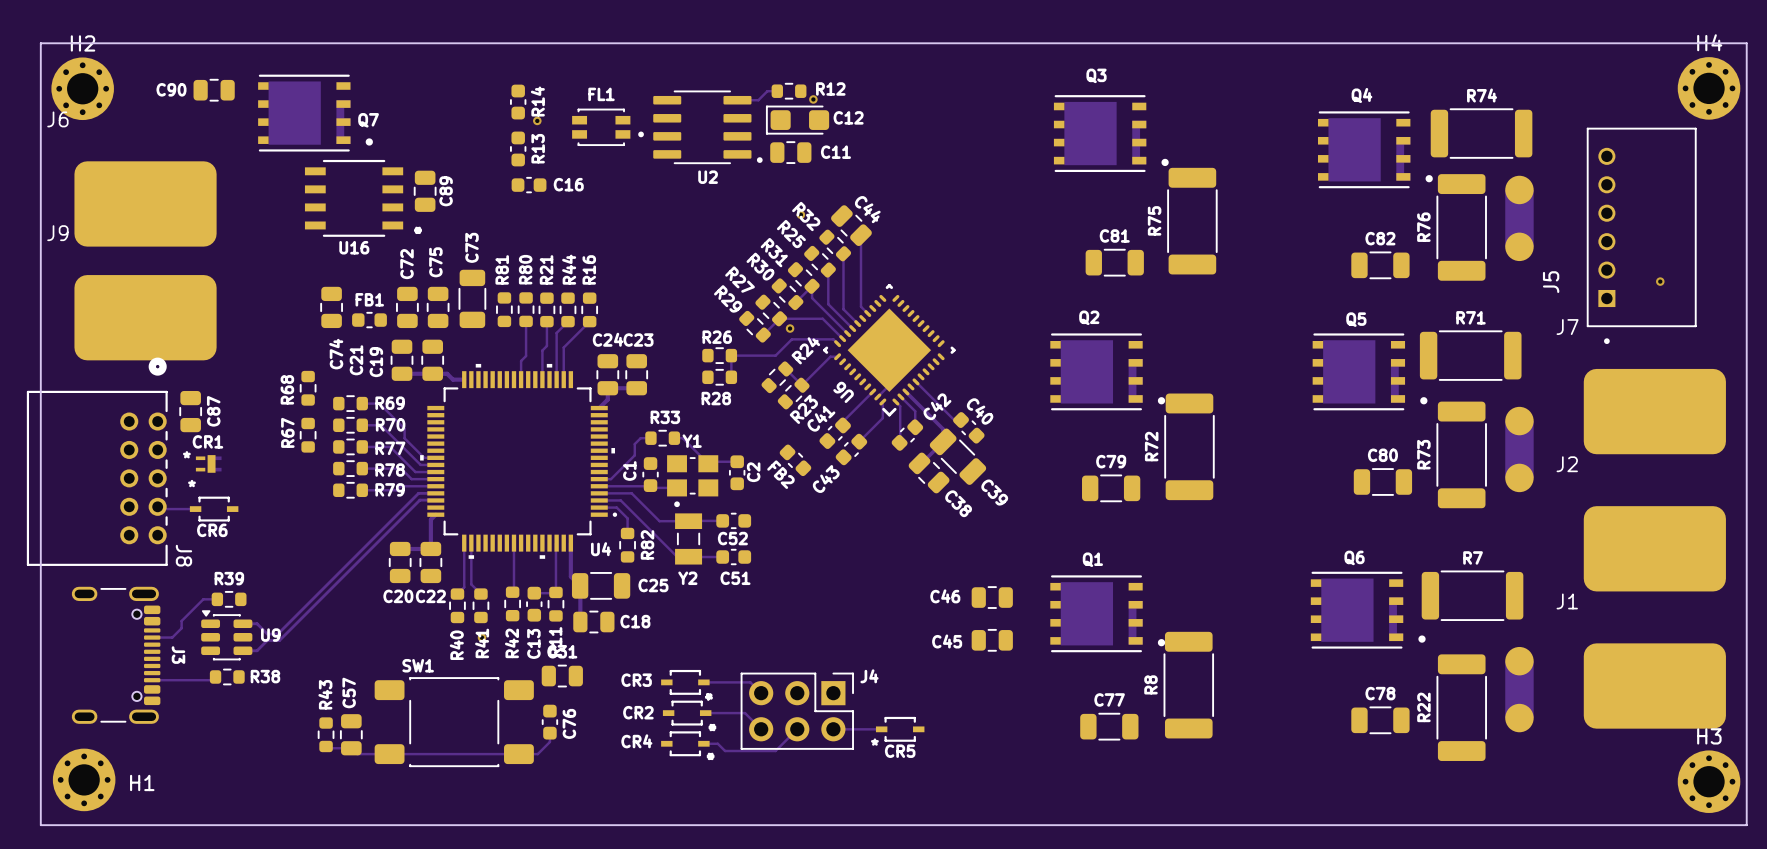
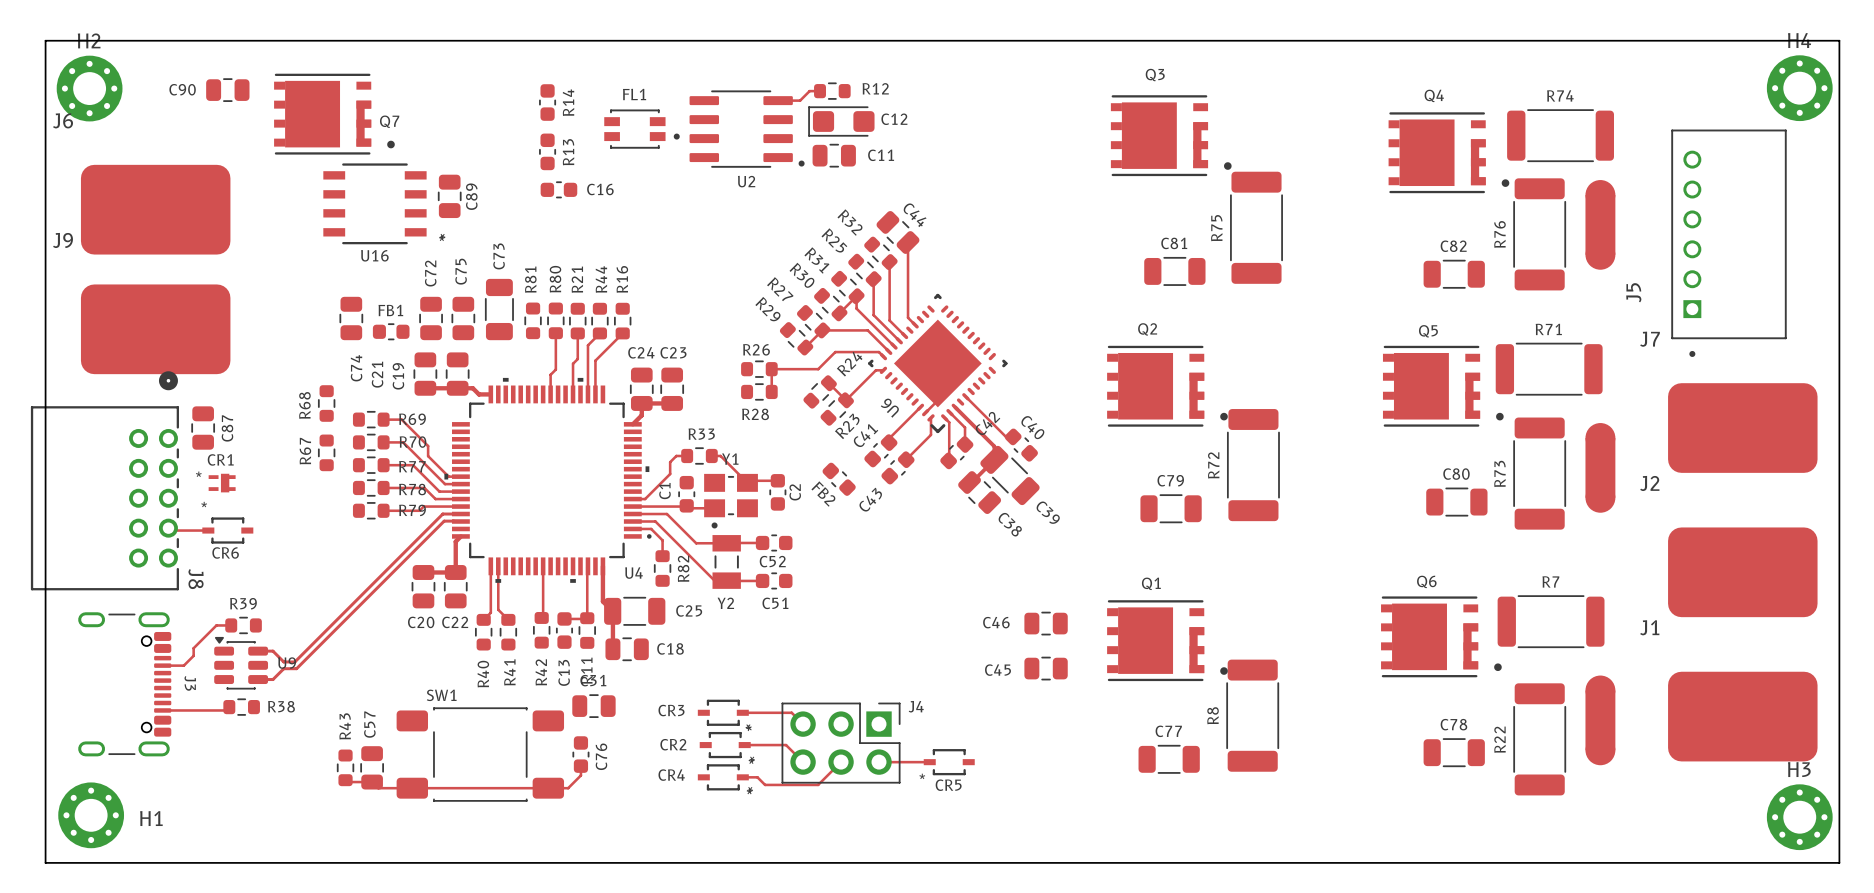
via: (813, 99) -> none
via: (537, 120) -> none
via: (800, 214) -> none
via: (1660, 281) -> none
via: (790, 328) -> none
via: (482, 637) -> none

